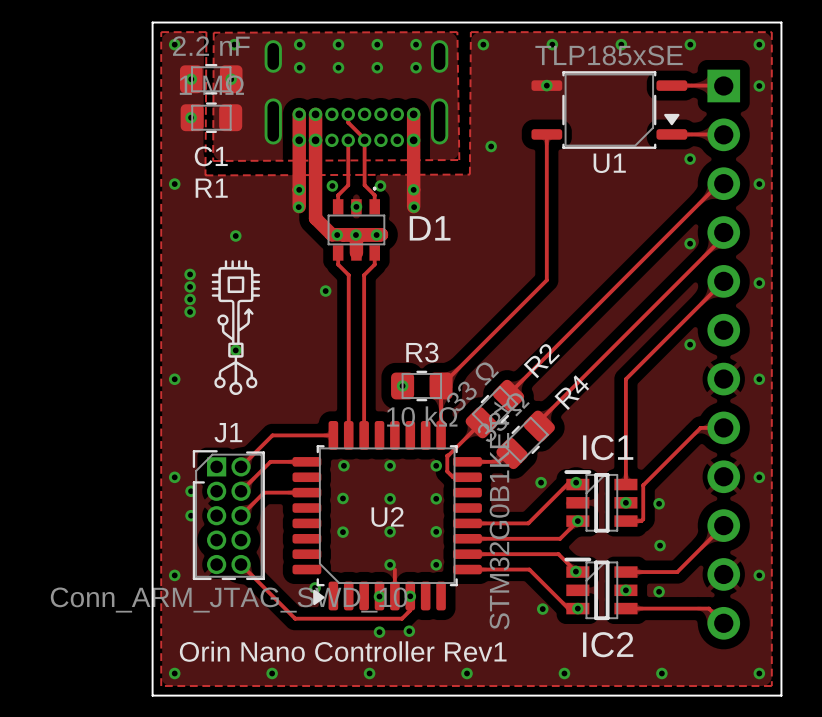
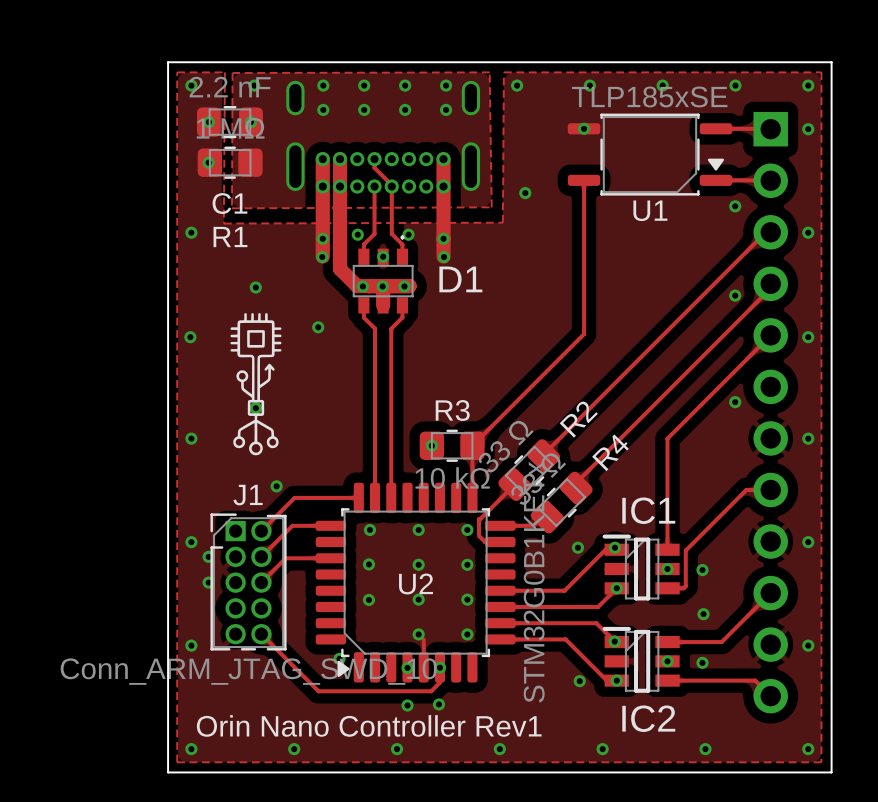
via: (190, 274) -> none
via: none -> (190, 337)
via: (190, 286) -> none
via position: (325, 291) -> (318, 327)
via: (190, 299) -> none
via: (190, 311) -> none
via: none -> (276, 486)

